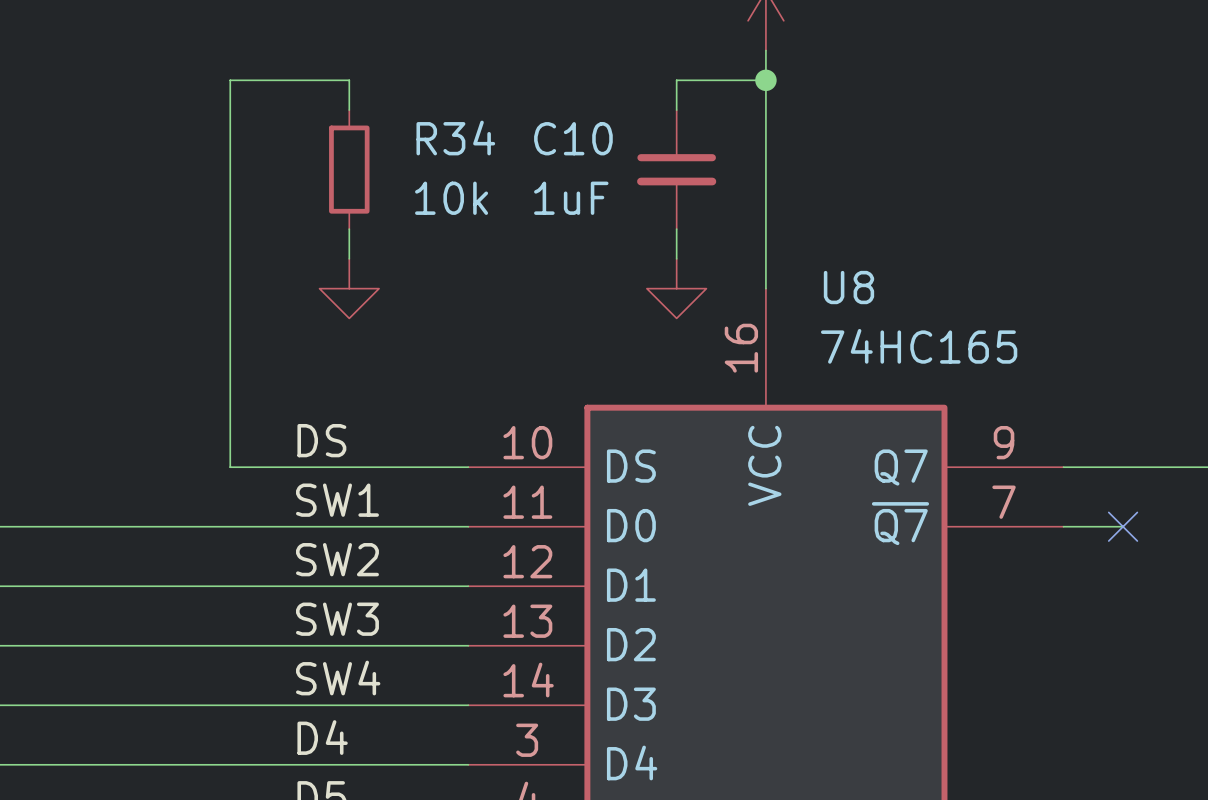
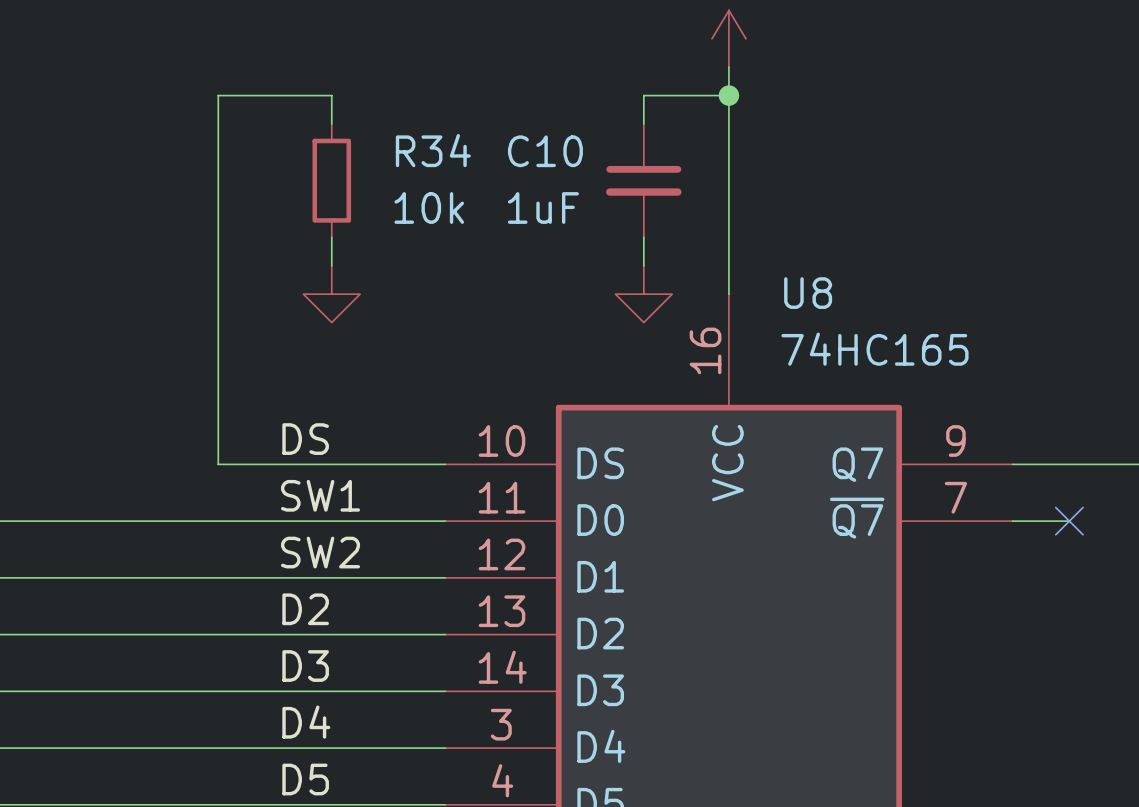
label: SW3 (337, 619) -> D2 (305, 609)
label: SW4 (338, 678) -> D3 (305, 666)

